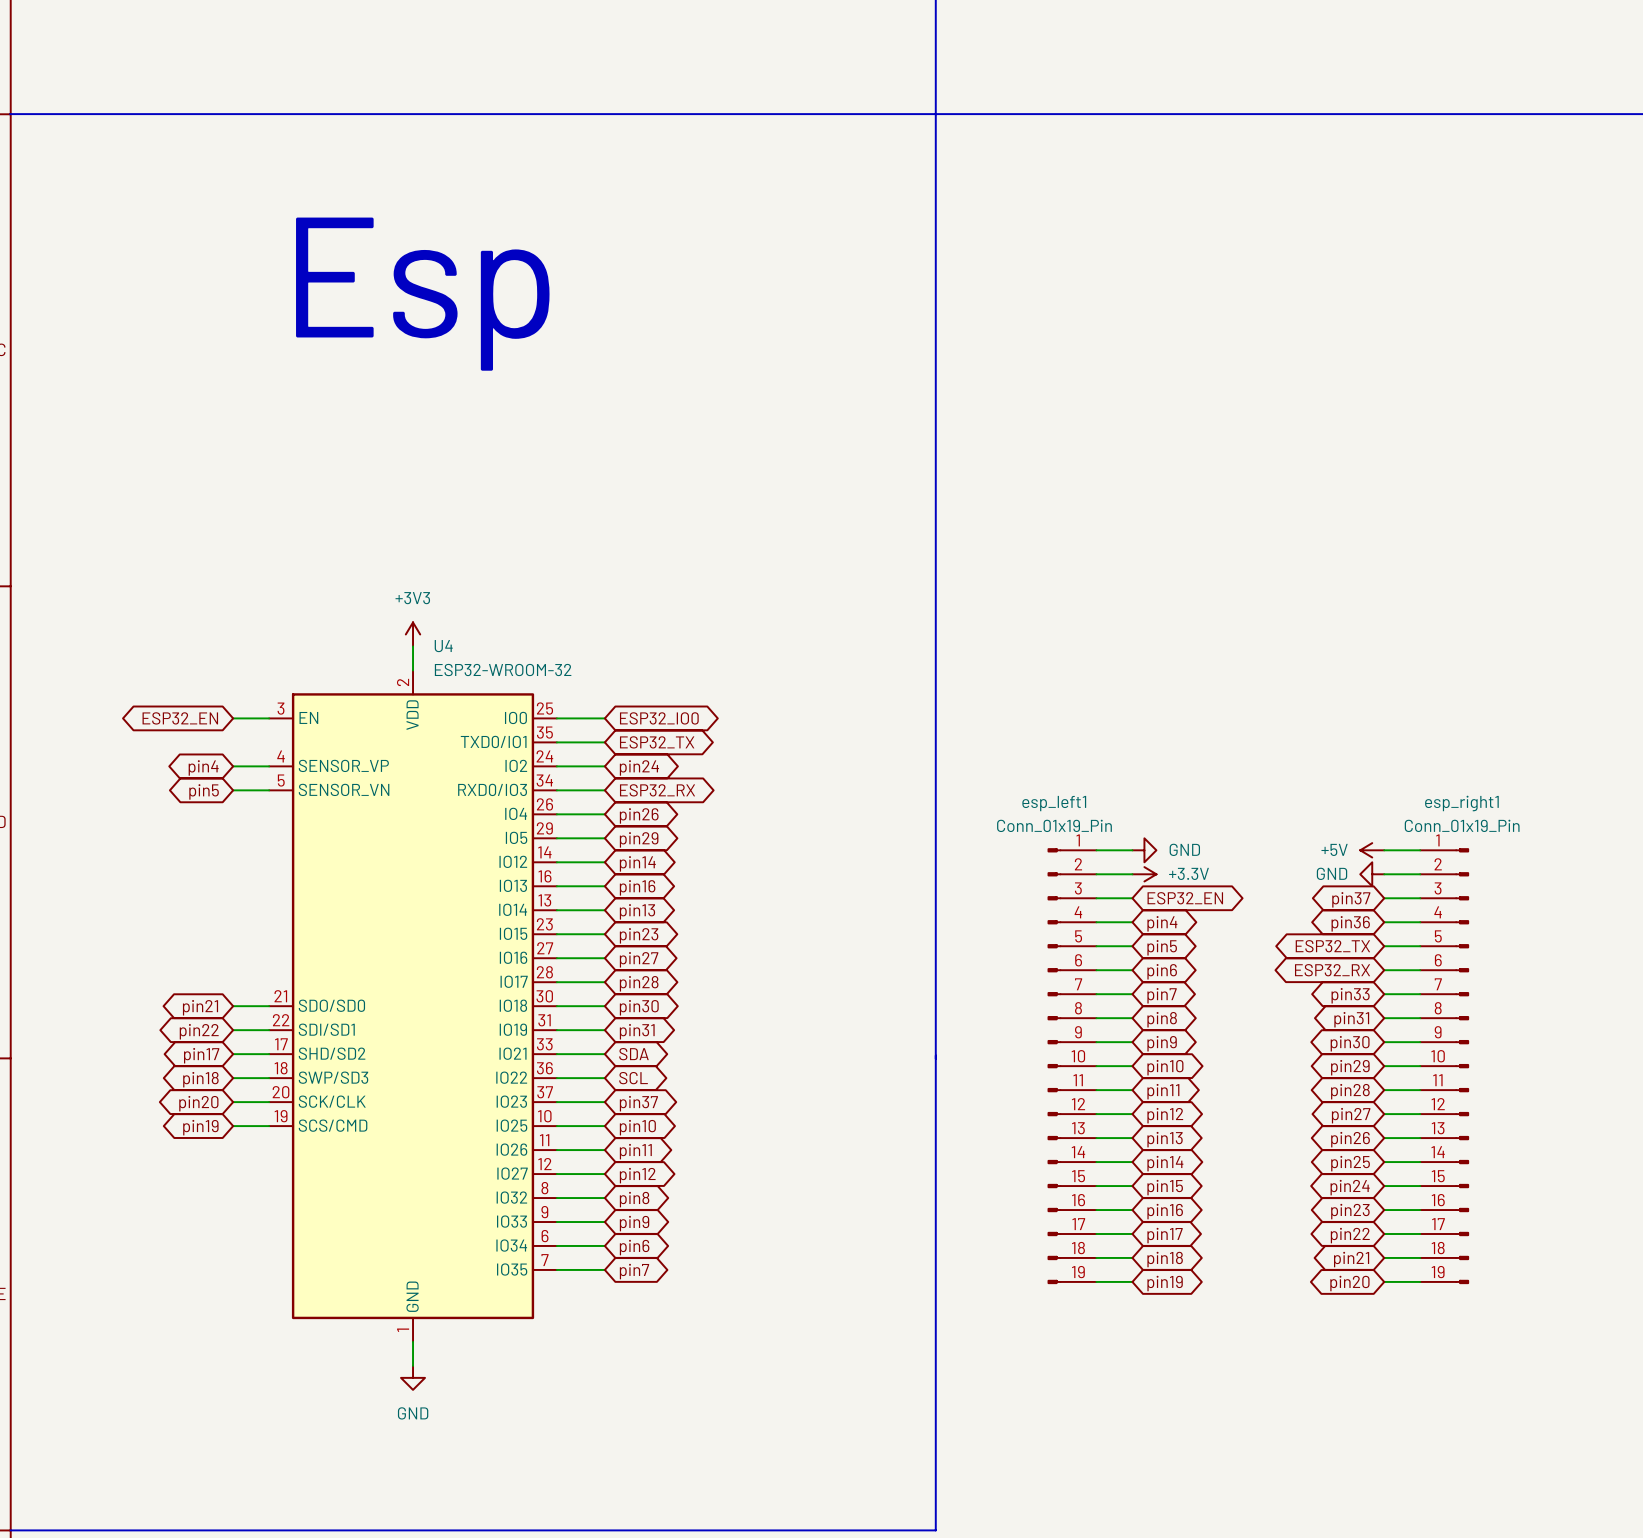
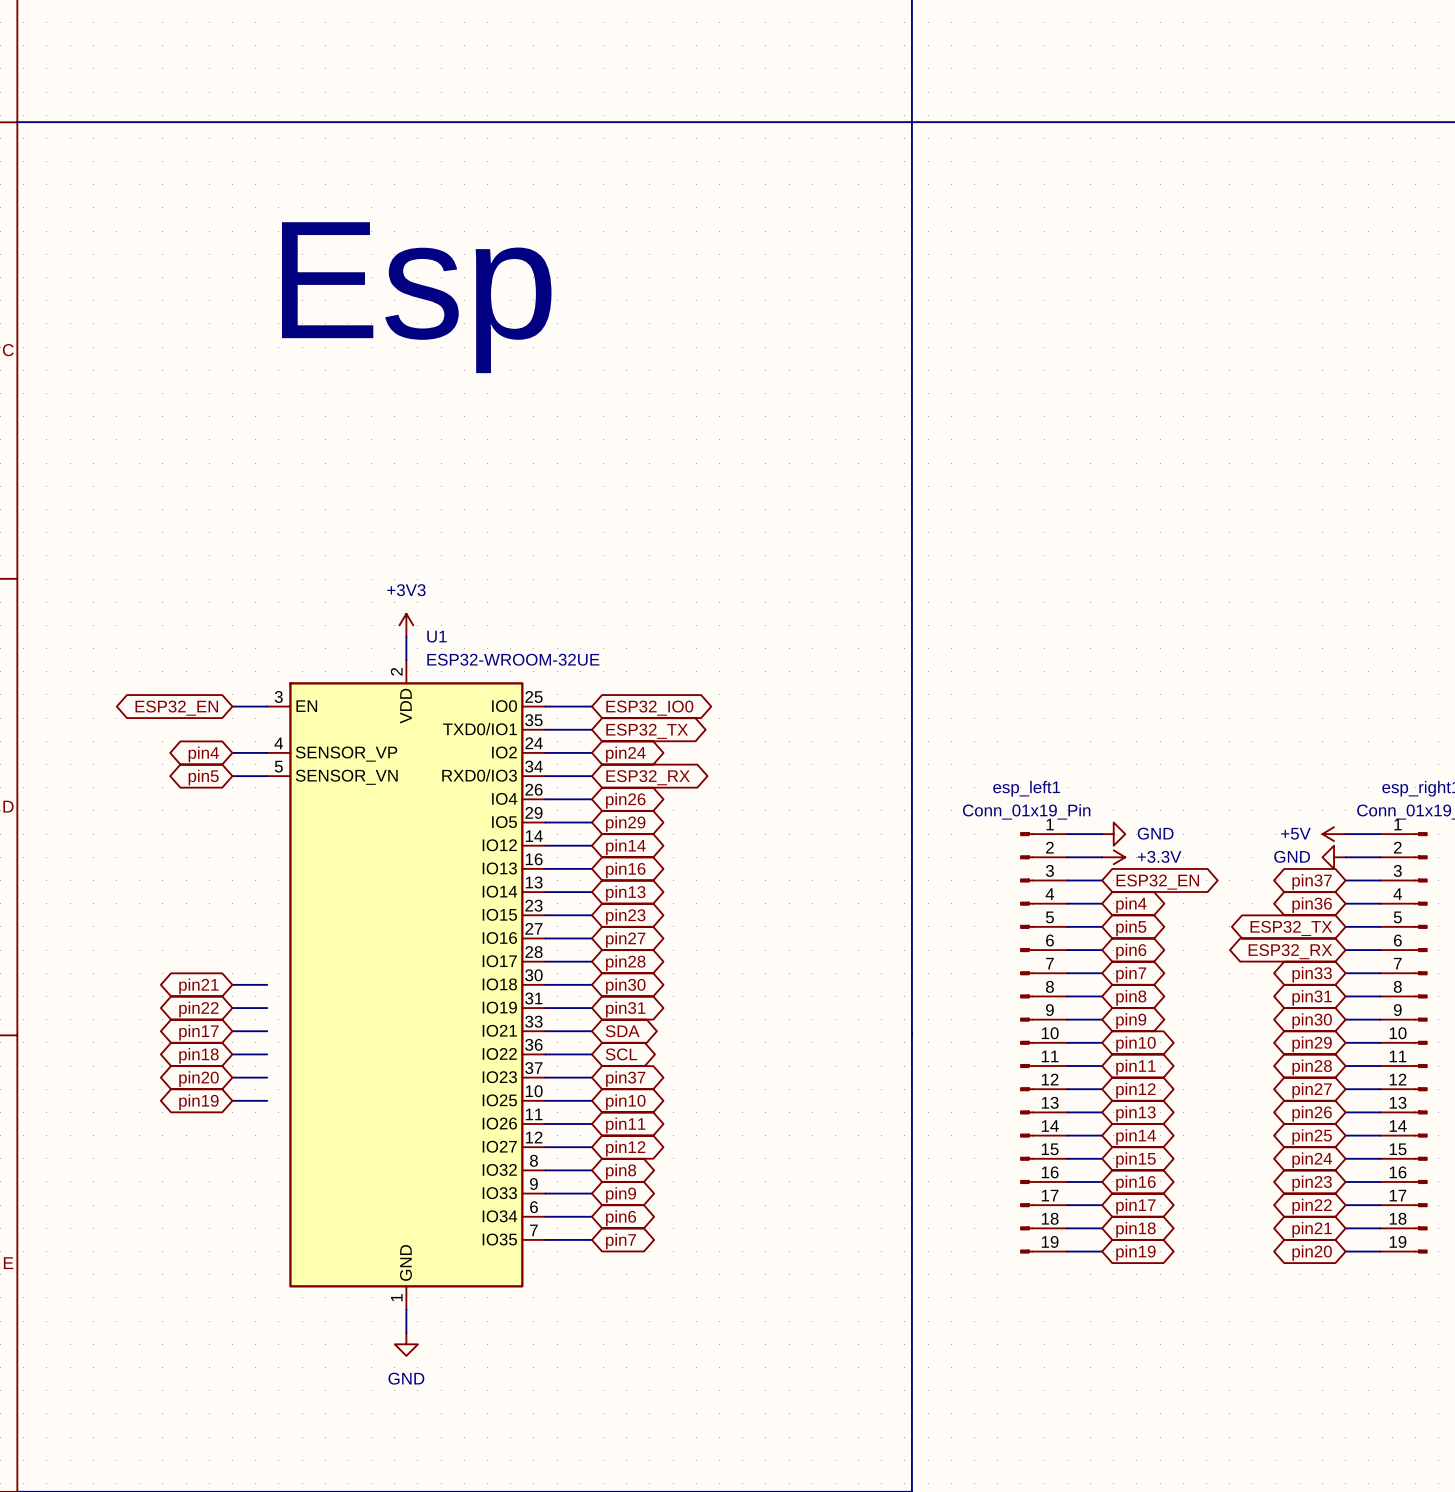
U4: ESP32-WROOM-32 (413, 1006) -> none
U1: none -> ESP32-WROOM-32UE (406, 984)

